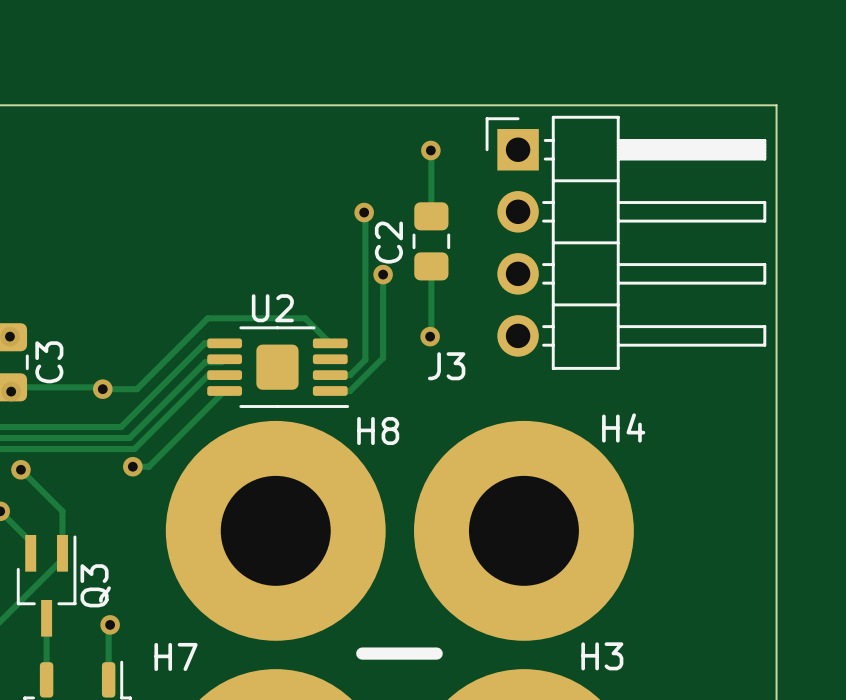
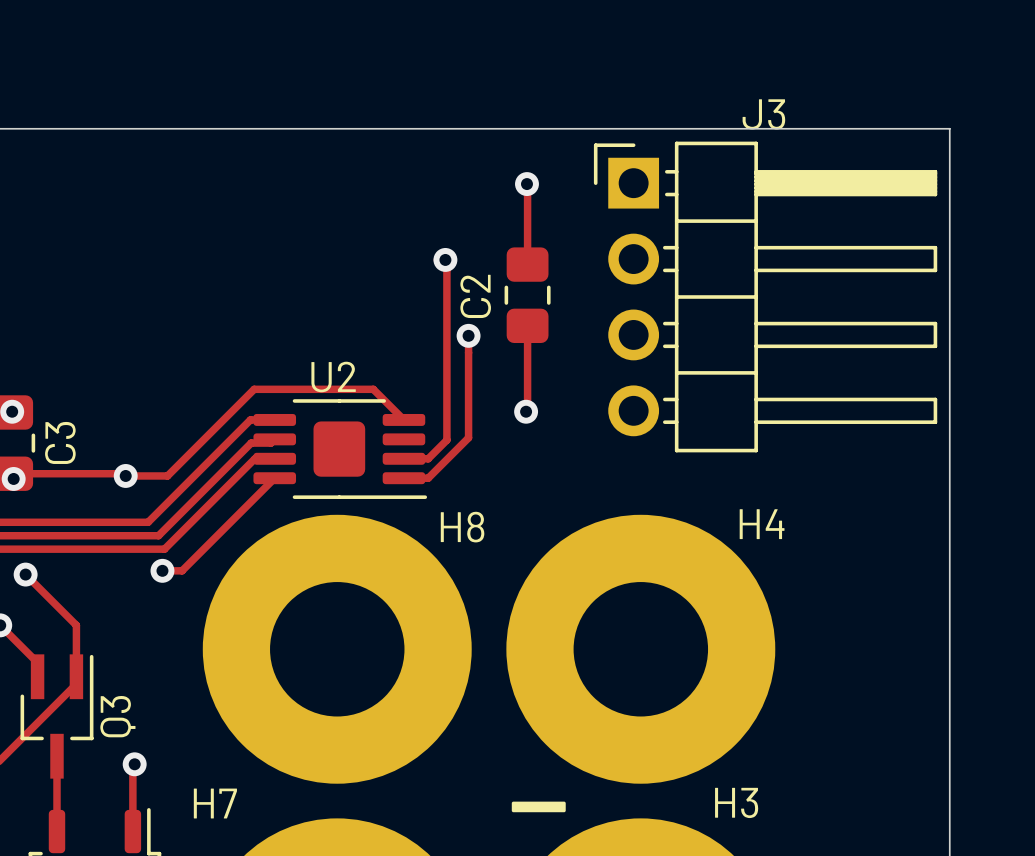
J3 name position: J3 (446, 366) -> J3 (763, 114)

